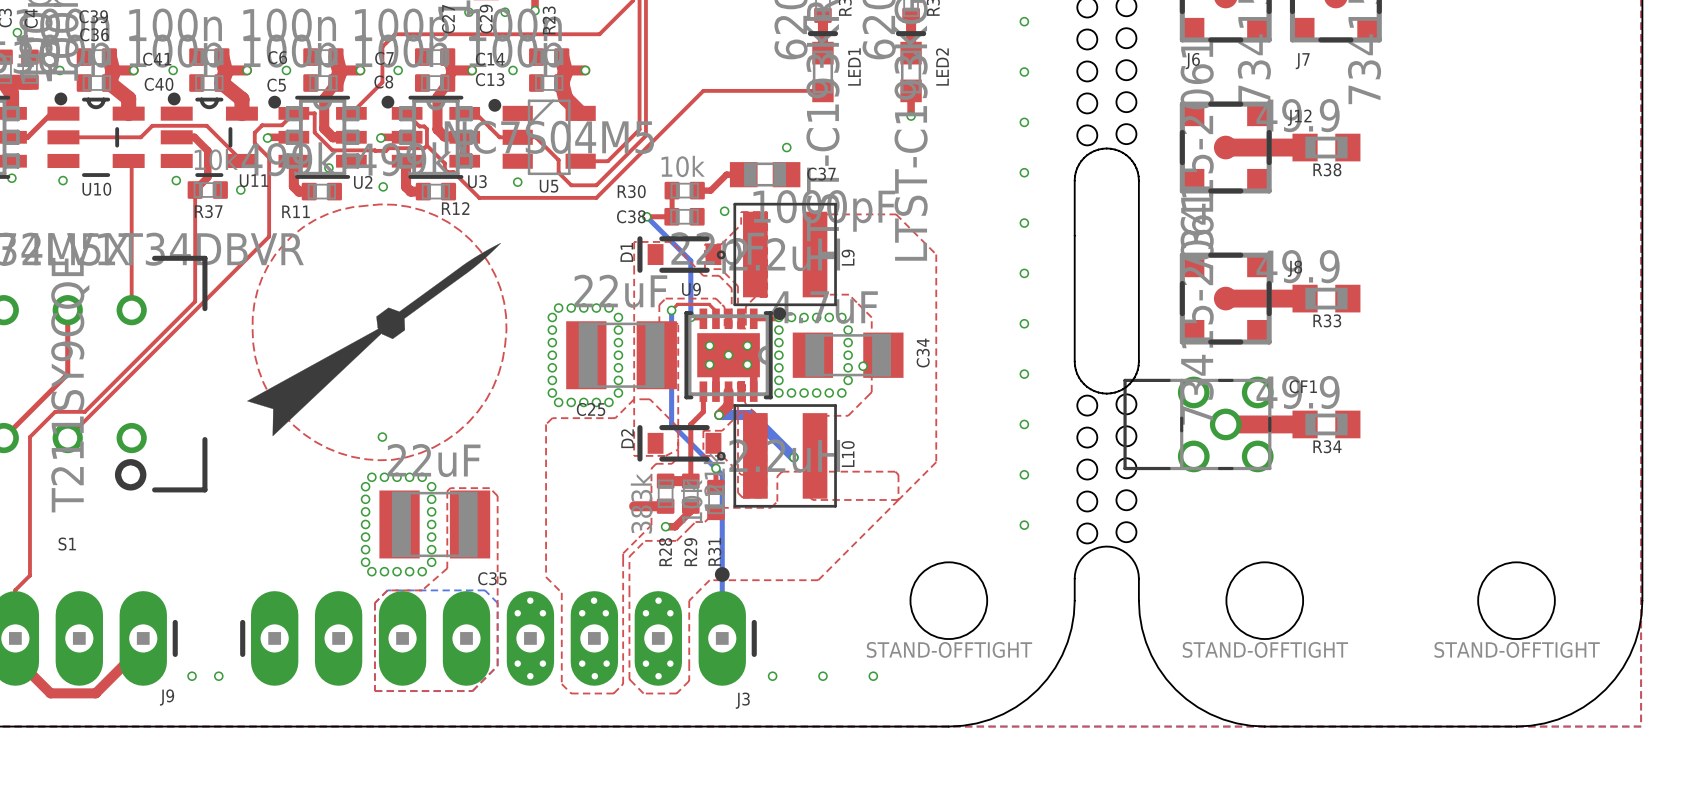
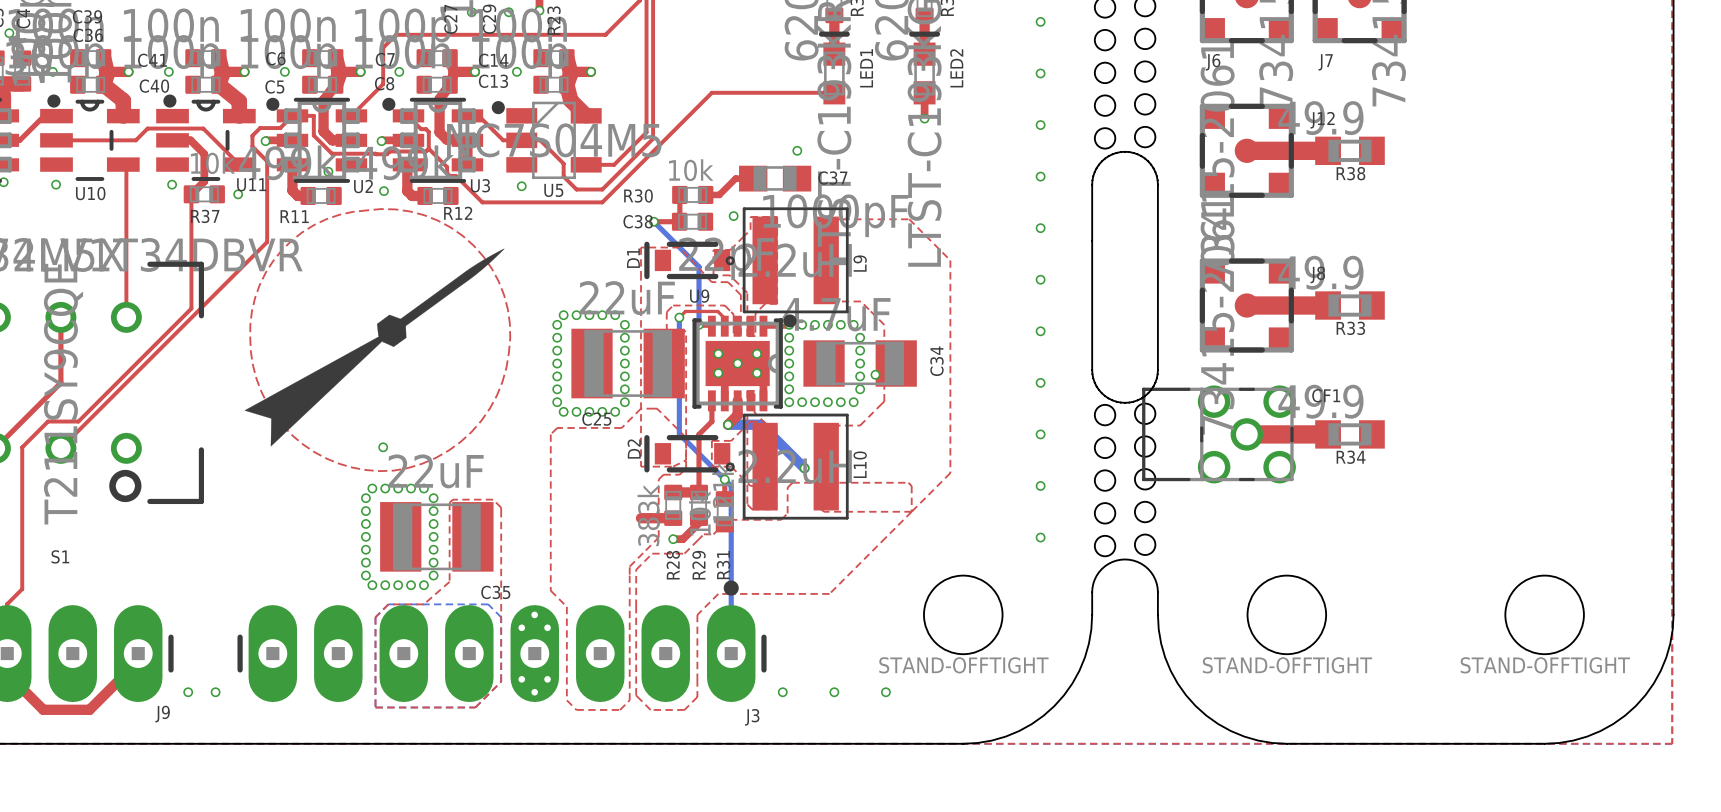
via: (594, 600) -> none
via: (658, 600) -> none
via: (582, 613) -> none
via: (605, 613) -> none
via: (645, 613) -> none
via: (670, 613) -> none
via: (582, 663) -> none
via: (606, 663) -> none
via: (645, 663) -> none
via: (670, 663) -> none
via: (594, 676) -> none
via: (658, 676) -> none

